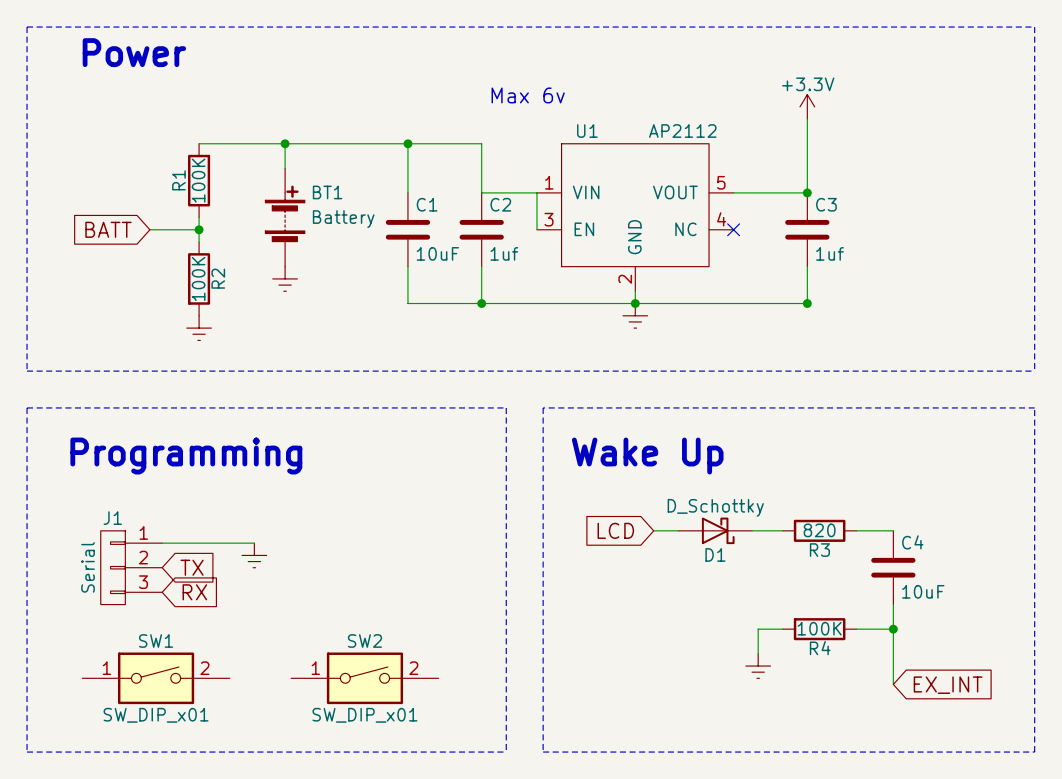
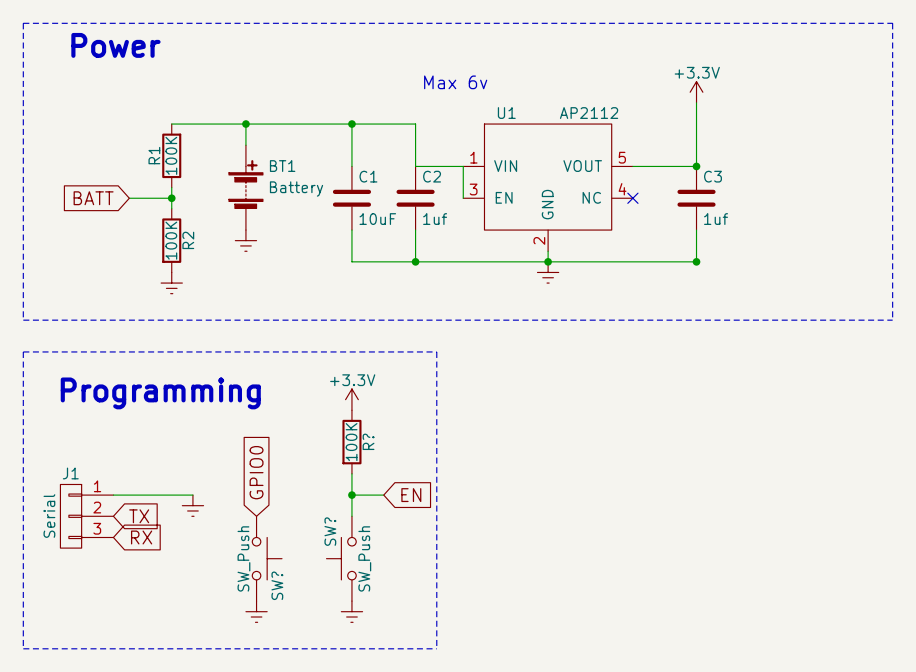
line: (543, 407) (543, 752) (1034, 752) (1034, 407) (543, 407) -> none
text: Wake Up (647, 456) -> none
power symbol: none -> +3.3V (351, 399)
R?: none -> 100K (351, 442)
global label: LCD (615, 530) -> none
wire: (653, 530) (678, 530) -> none
D1: D_Schottky (715, 530) -> none
wire: (752, 530) (782, 530) -> none
R3: 820 (819, 530) -> none
wire: (856, 530) (893, 530) -> none
wire: (162, 543) (254, 543) -> (113, 495) (192, 495)
global label: none -> GPIO0 (256, 472)
wire: none -> (351, 473) (351, 516)
power symbol position: (254, 555) -> (192, 505)
J1 position: (131, 567) -> (86, 516)
global label position: TX (192, 567) -> TX (139, 516)
C4: 10uF (893, 567) -> none
wire: none -> (351, 495) (383, 495)
junction: none -> (351, 495)
global label: none -> EN (411, 495)
global label position: RX (194, 592) -> RX (141, 537)
wire: (893, 604) (893, 684) -> none
wire: (782, 629) (758, 629) (758, 653) -> none
R4: 100K (819, 629) -> none
wire: (856, 629) (893, 629) -> none
junction: (893, 629) -> none
SW?: none -> SW_Push (267, 558)
SW?: none -> SW_Push (341, 558)
power symbol: (758, 666) -> none
SW1: SW_DIP_x01 (156, 678) -> none
SW2: SW_DIP_x01 (364, 678) -> none
global label: EX_INT (948, 685) -> none
power symbol: none -> (256, 611)
power symbol: none -> (351, 611)

